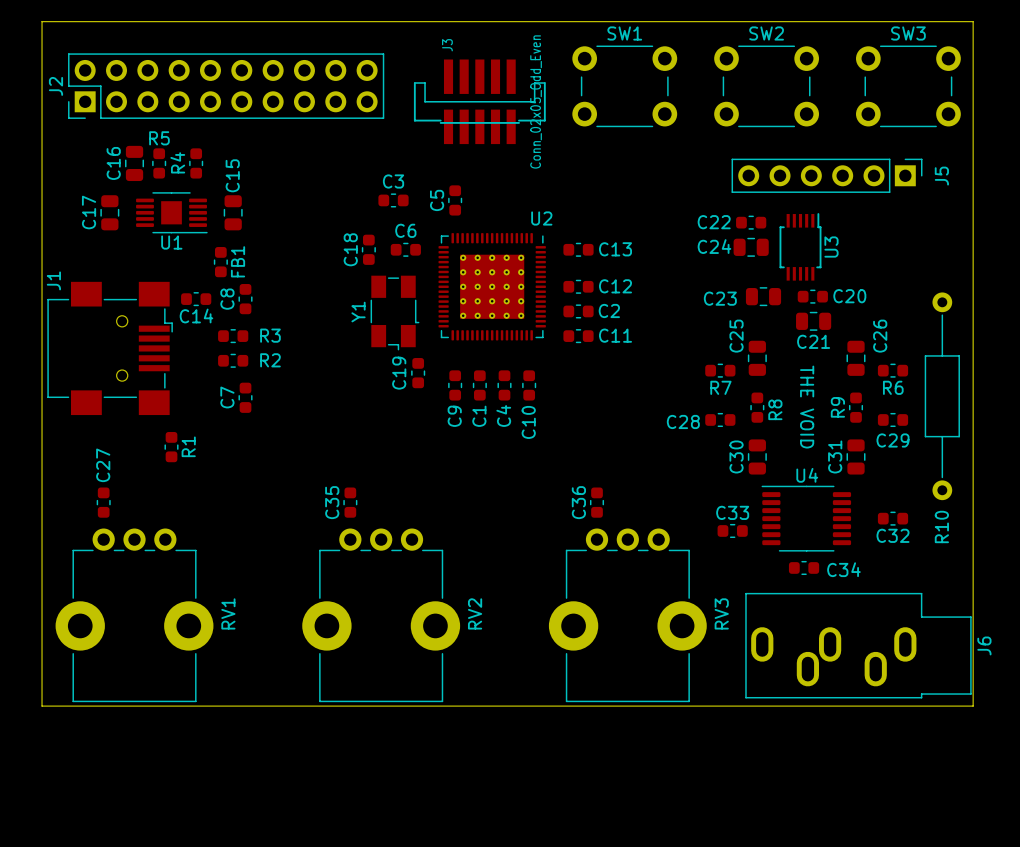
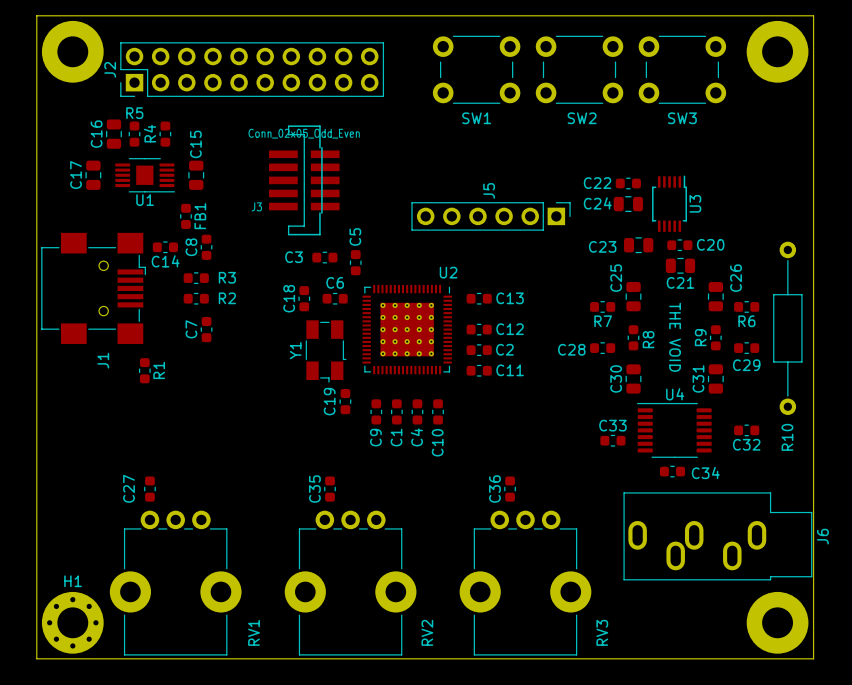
SW1 name position: SW1 (624, 33) -> SW1 (476, 118)
SW2 name position: SW2 (766, 33) -> SW2 (582, 118)
SW3 name position: SW3 (908, 33) -> SW3 (682, 118)
part: none -> (72, 51)
part: none -> (777, 51)
J2 position: (226, 86) -> (252, 69)
SW1 position: (624, 86) -> (476, 69)
SW2 position: (766, 86) -> (579, 69)
SW3 position: (908, 86) -> (682, 69)
J3 rotation: 0° (479, 101) -> 90° counterclockwise (304, 180)
J3 position: (479, 101) -> (304, 180)
J5 position: (827, 175) -> (491, 216)
J5 name position: J5 (941, 176) -> J5 (489, 190)
C3 name position: C3 (393, 181) -> C3 (294, 257)
C3 position: (393, 200) -> (324, 257)
C5 name position: C5 (437, 200) -> C5 (355, 236)
C5 position: (455, 200) -> (355, 262)
C18 position: (368, 249) -> (304, 298)
C6 position: (405, 249) -> (335, 298)
C13 position: (578, 249) -> (479, 298)
J1 name position: J1 (53, 280) -> J1 (103, 360)
U2 position: (492, 286) -> (407, 329)
C12 position: (578, 286) -> (479, 329)
C2 position: (578, 311) -> (479, 350)
Y1 position: (394, 313) -> (326, 351)
C11 position: (578, 336) -> (479, 370)
C19 position: (418, 373) -> (345, 401)
C9 position: (455, 385) -> (376, 411)
C1 position: (479, 385) -> (396, 411)
C4 position: (504, 385) -> (417, 411)
C10 position: (529, 385) -> (438, 411)
C27 name position: C27 (103, 465) -> C27 (129, 488)
C27 position: (103, 502) -> (149, 489)
C35 position: (350, 502) -> (330, 489)
C36 position: (597, 502) -> (510, 489)
RV1 name position: RV1 (228, 613) -> RV1 (254, 632)
RV2 name position: RV2 (475, 613) -> RV2 (427, 632)
RV3 name position: RV3 (721, 613) -> RV3 (602, 632)
RV1 position: (134, 615) -> (175, 583)
RV2 position: (381, 615) -> (350, 583)
RV3 position: (627, 615) -> (525, 583)
board edge: (42, 706) (973, 706) -> (36, 586) (36, 658) (813, 658) (813, 586)
H1: none -> (72, 622)
part: none -> (777, 622)

